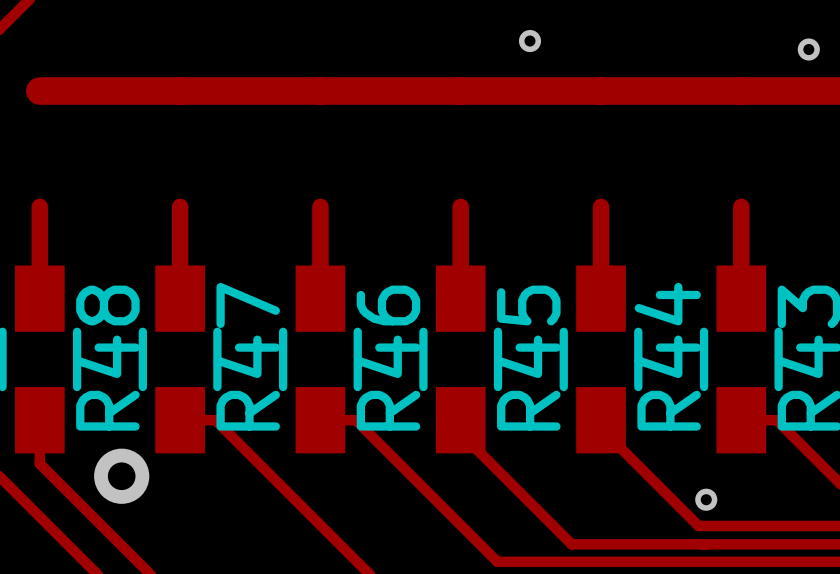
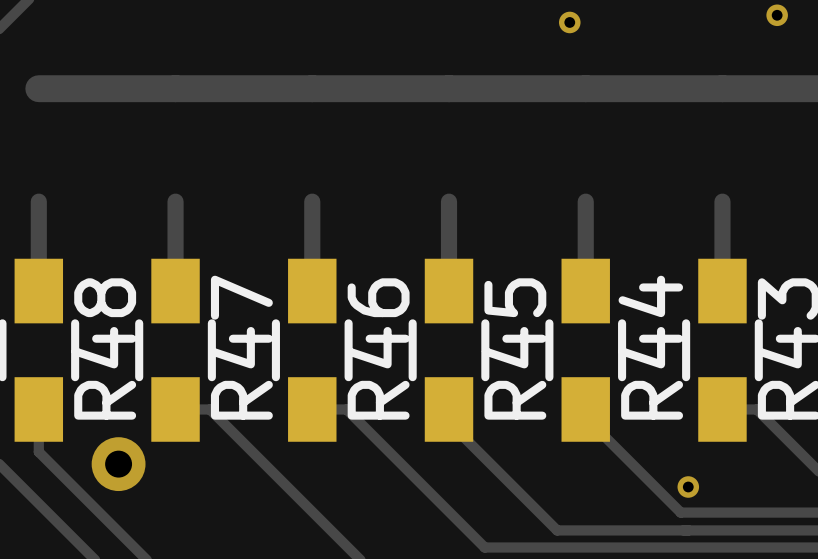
via: none -> (569, 22)
via: (529, 41) -> none
via position: (808, 49) -> (777, 15)

